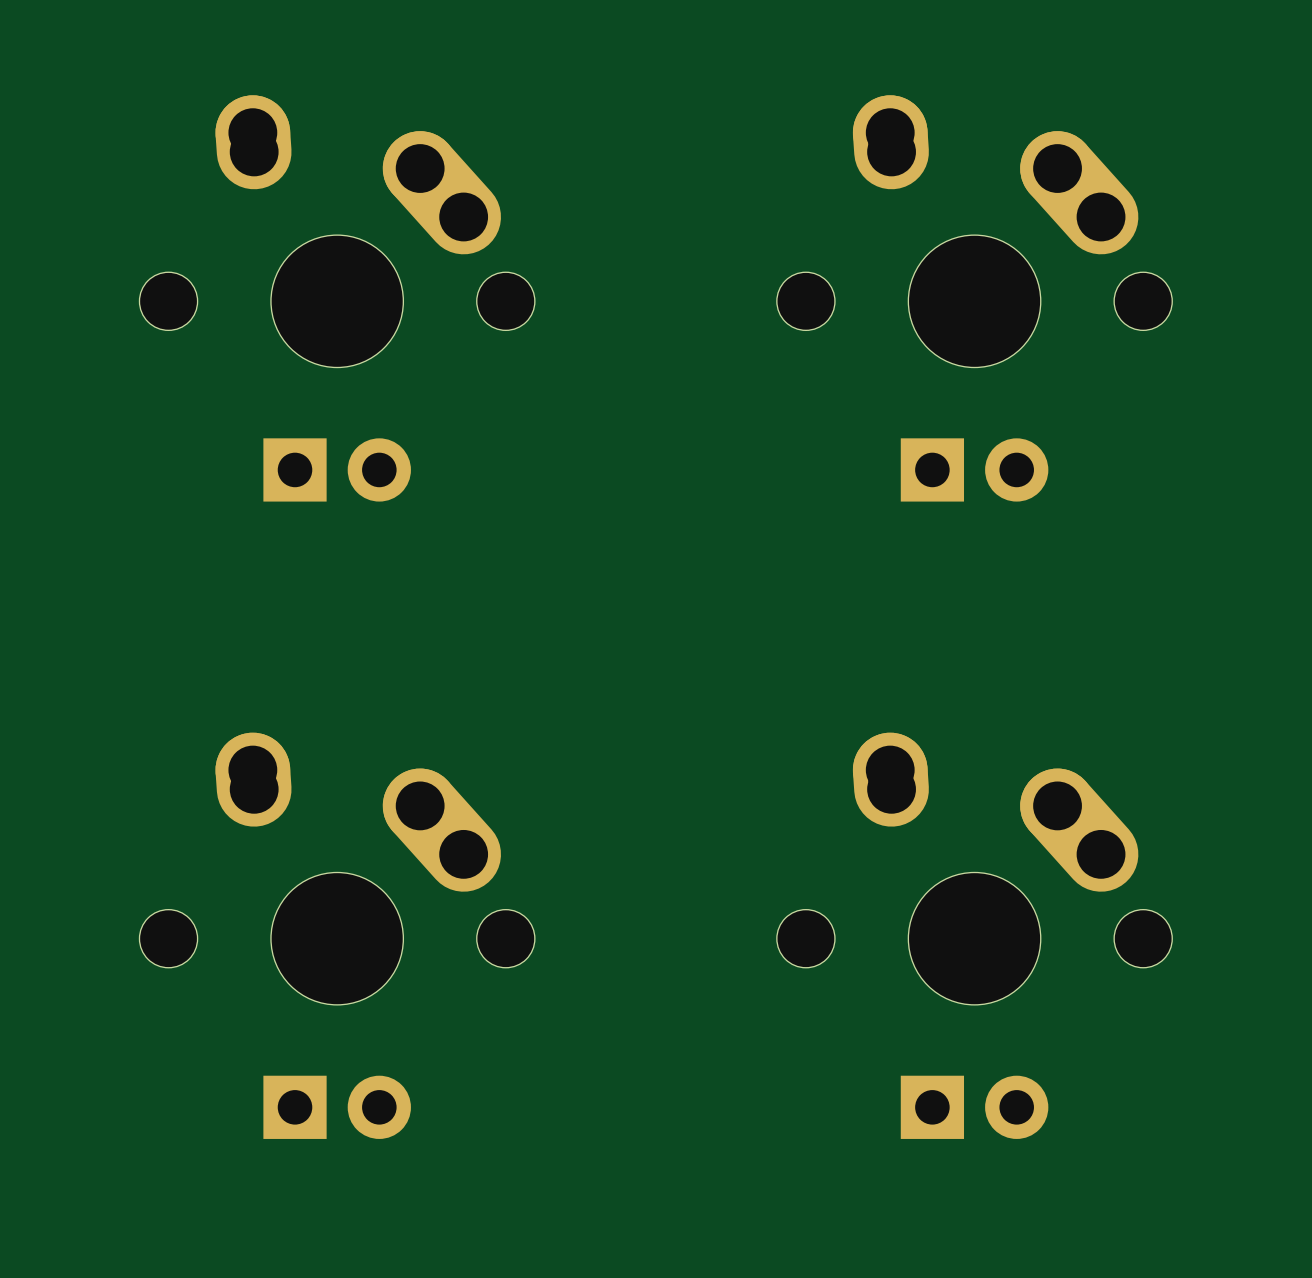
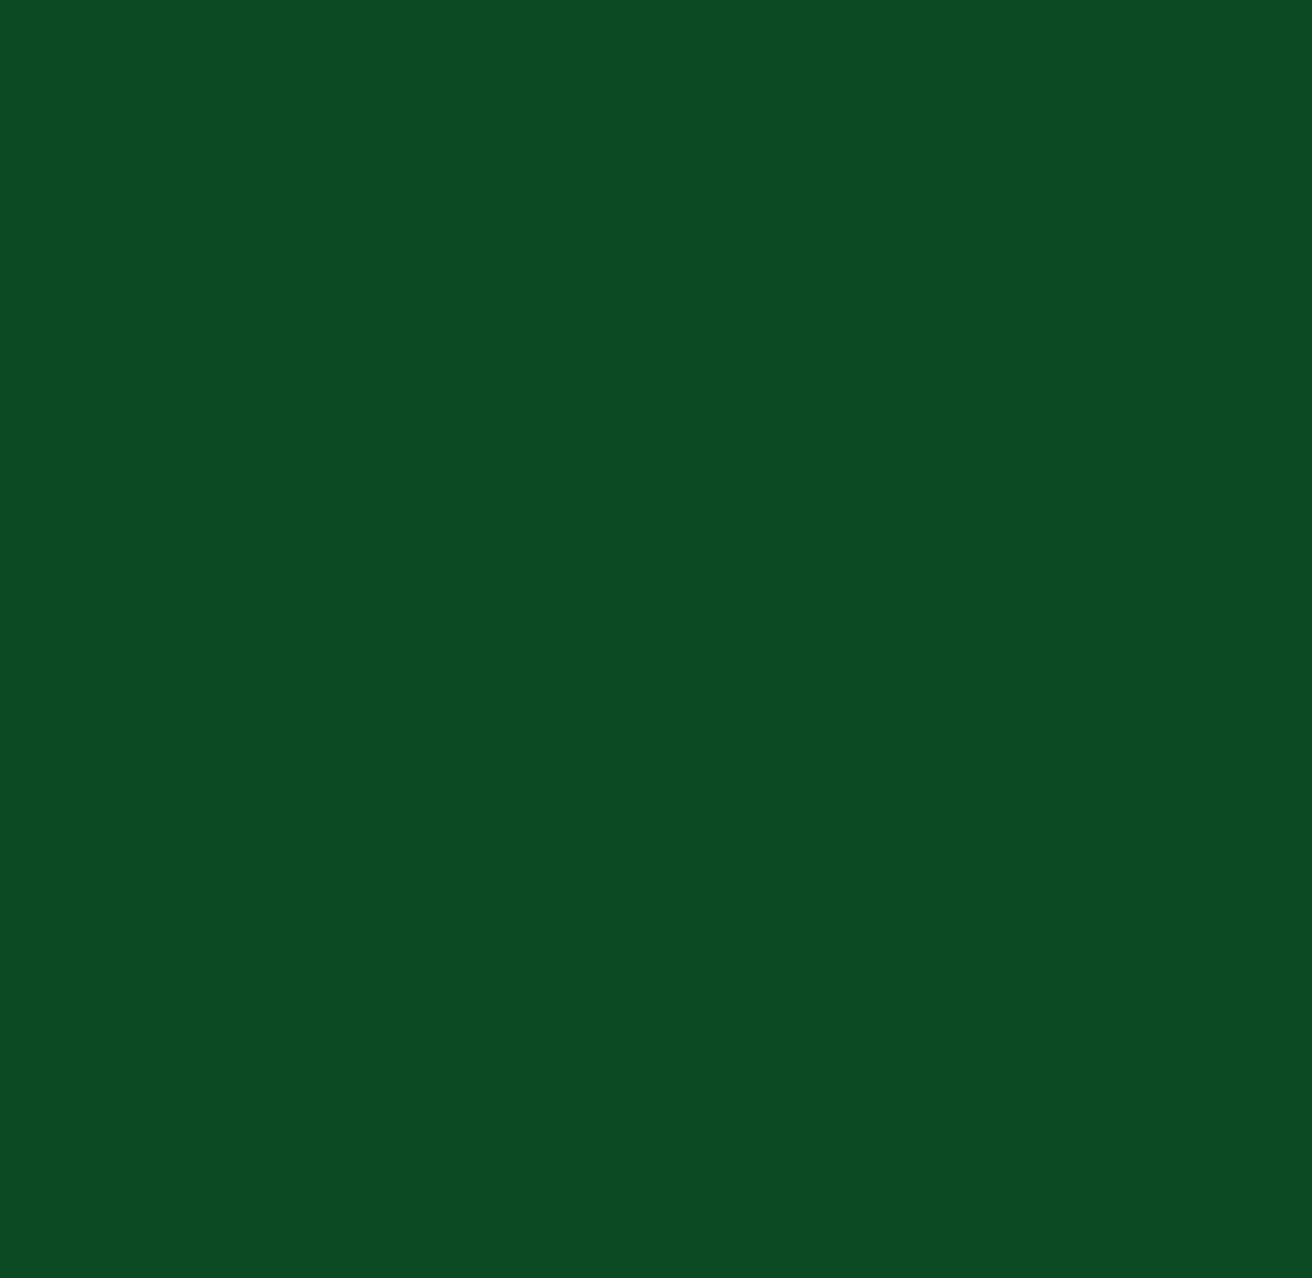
part: (337, 298) -> none
part: (974, 298) -> none
part: (337, 935) -> none
part: (974, 935) -> none

